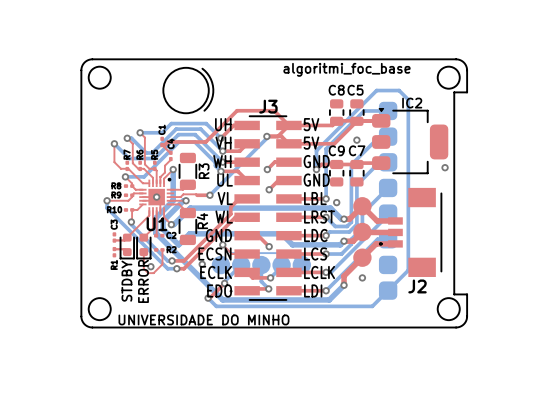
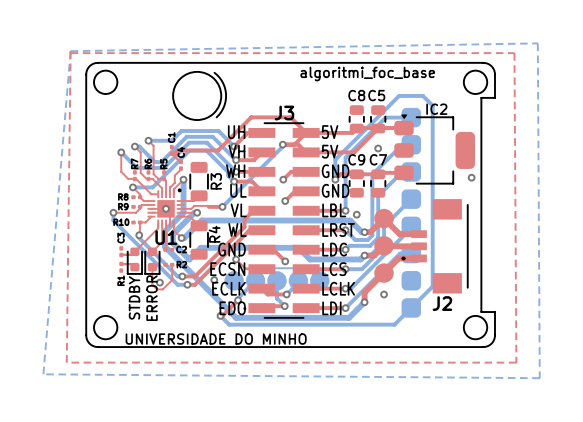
bottom zone outline: none -> (537, 43) (70, 51) (43, 374) (539, 378) (537, 43)
top zone outline: none -> (70, 51) (66, 362) (516, 362) (514, 53) (70, 53) (70, 51)

